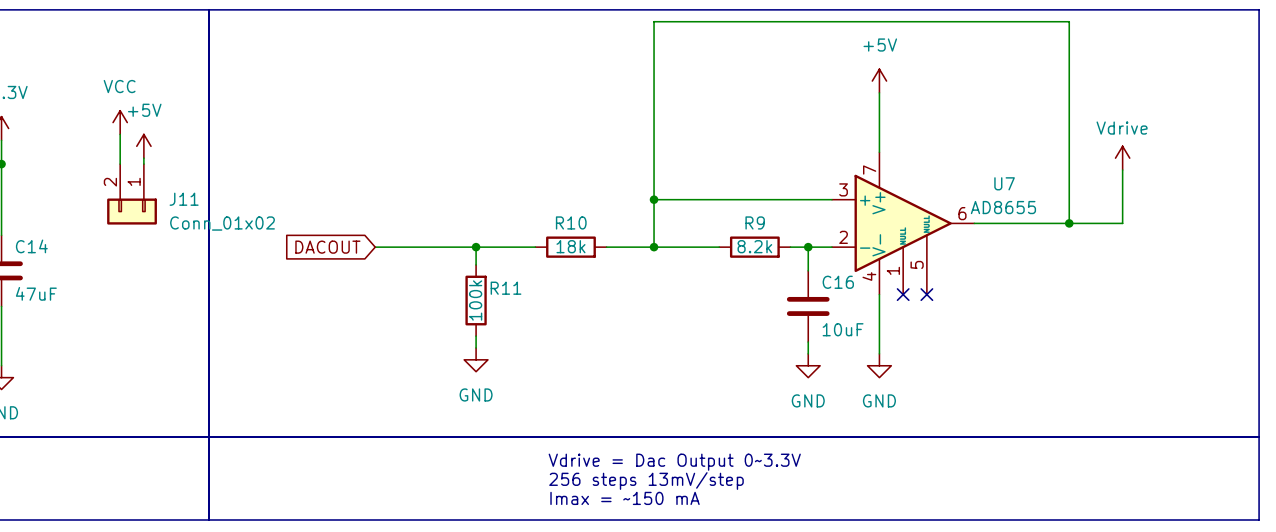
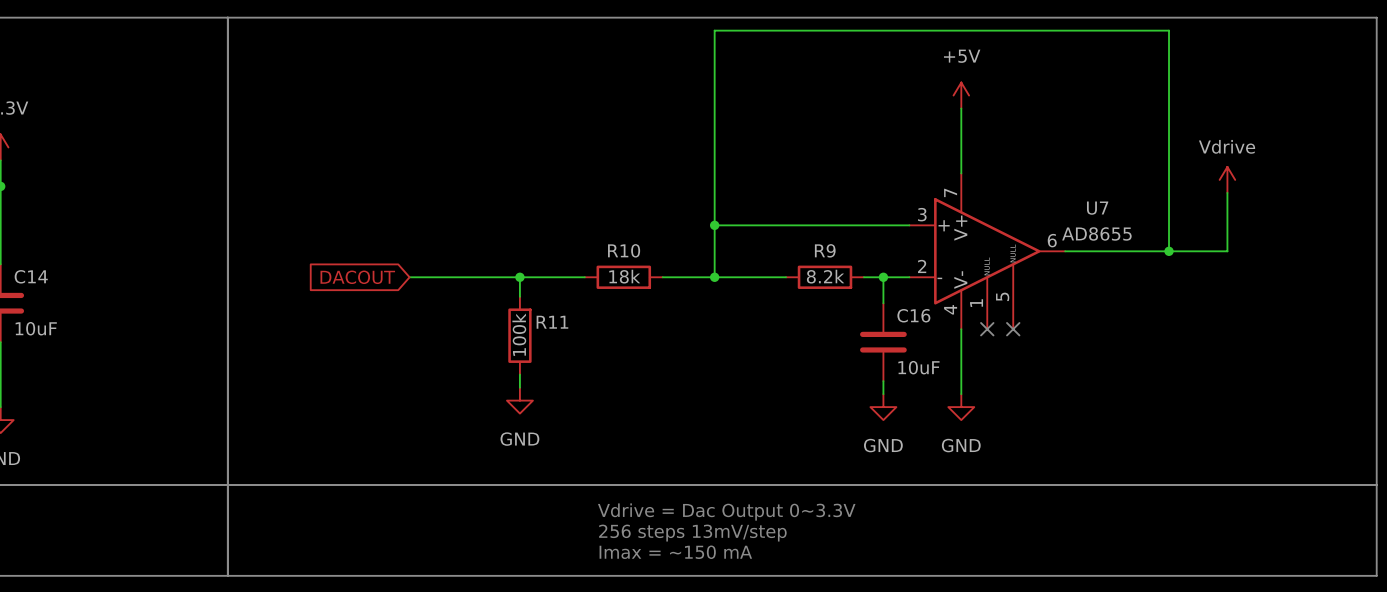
power symbol: VCC (120, 122) -> none
wire: (120, 134) (120, 164) -> none
power symbol: +5V (143, 146) -> none
wire: (143, 158) (143, 164) -> none
J11: Conn_01x02 (132, 194) -> none
C14 value: 47uF (36, 293) -> 10uF (36, 328)

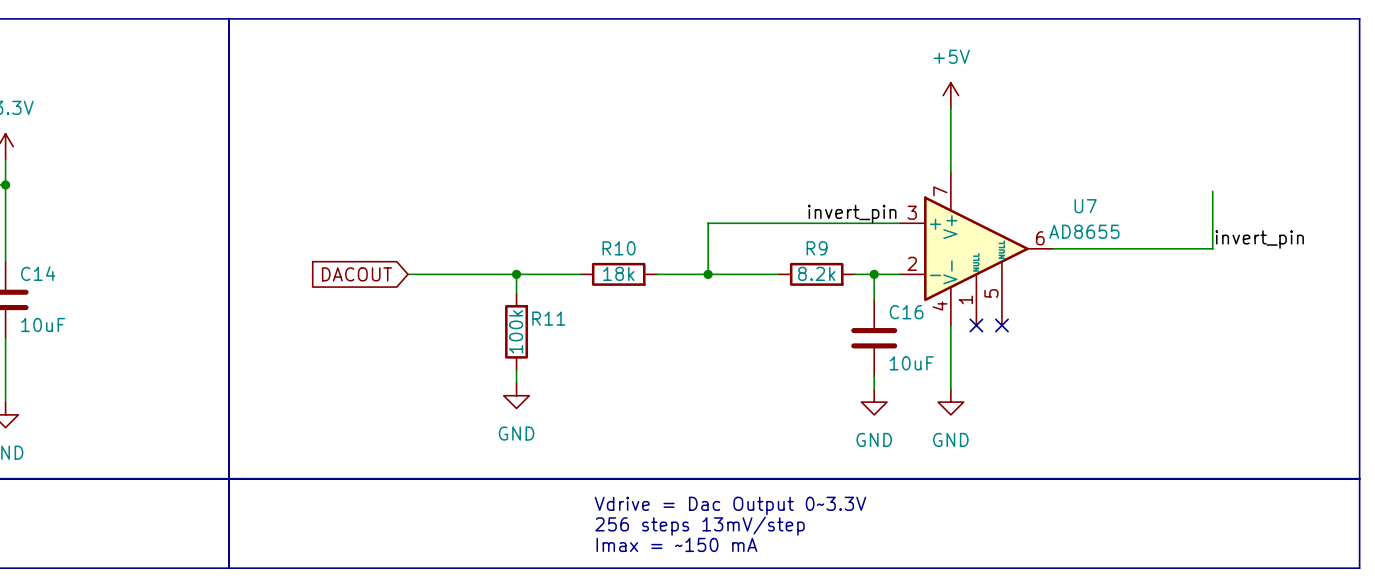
power symbol: Vdrive (1227, 179) -> none
label: none -> invert_pin (852, 214)
wire: (714, 225) (714, 30) (1169, 30) (1169, 251) -> none
junction: (714, 225) -> none
label: none -> invert_pin (1259, 239)
junction: (1169, 251) -> none

